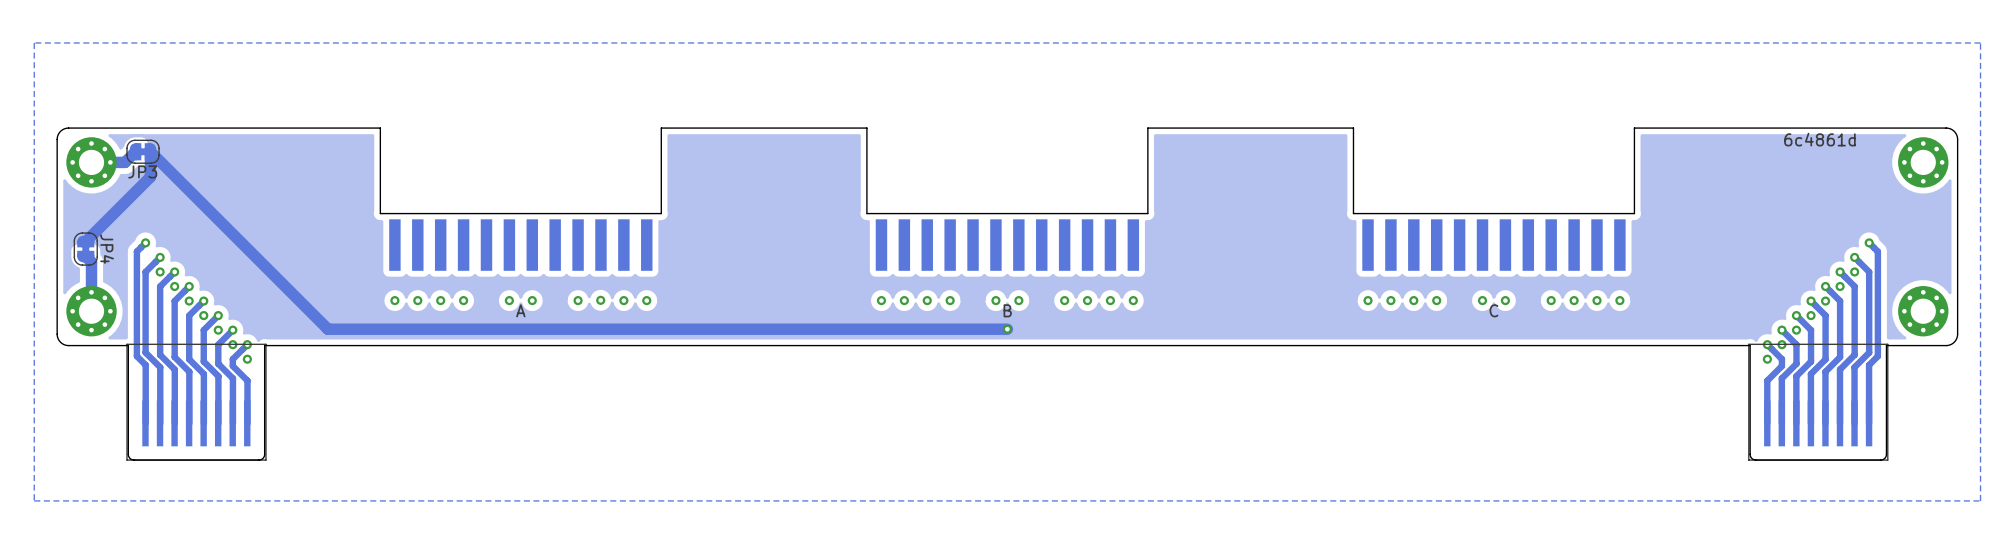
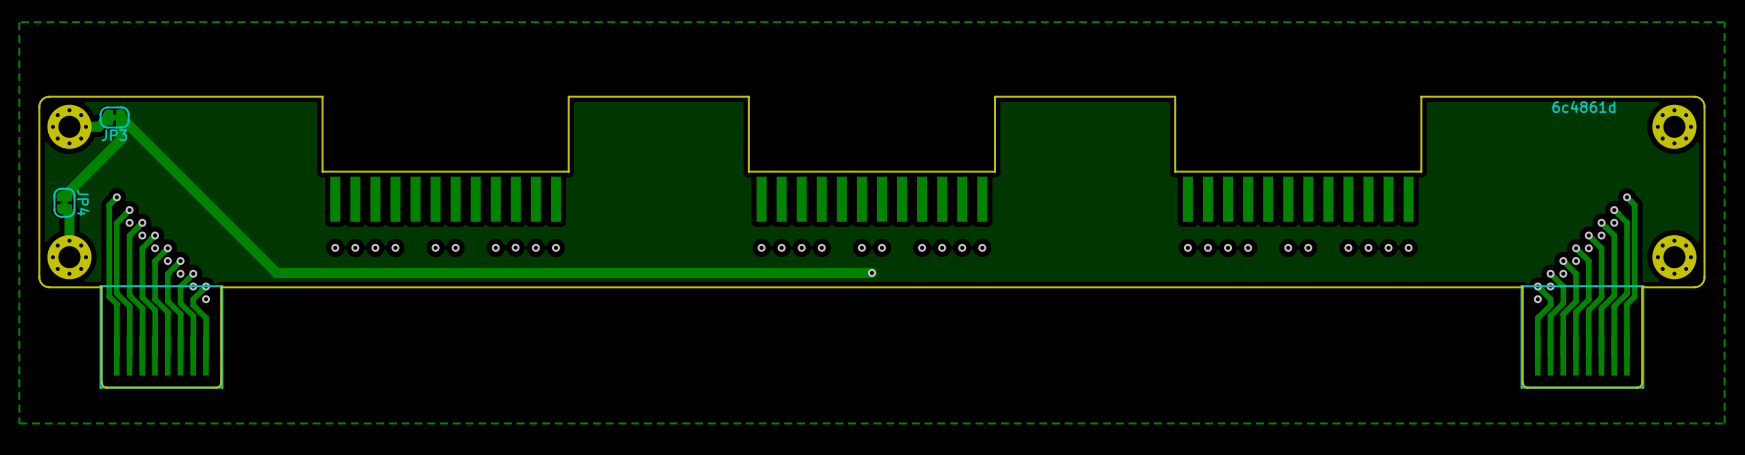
text: A (520, 310) -> none
text: B (1007, 310) -> none
text: C (1493, 310) -> none

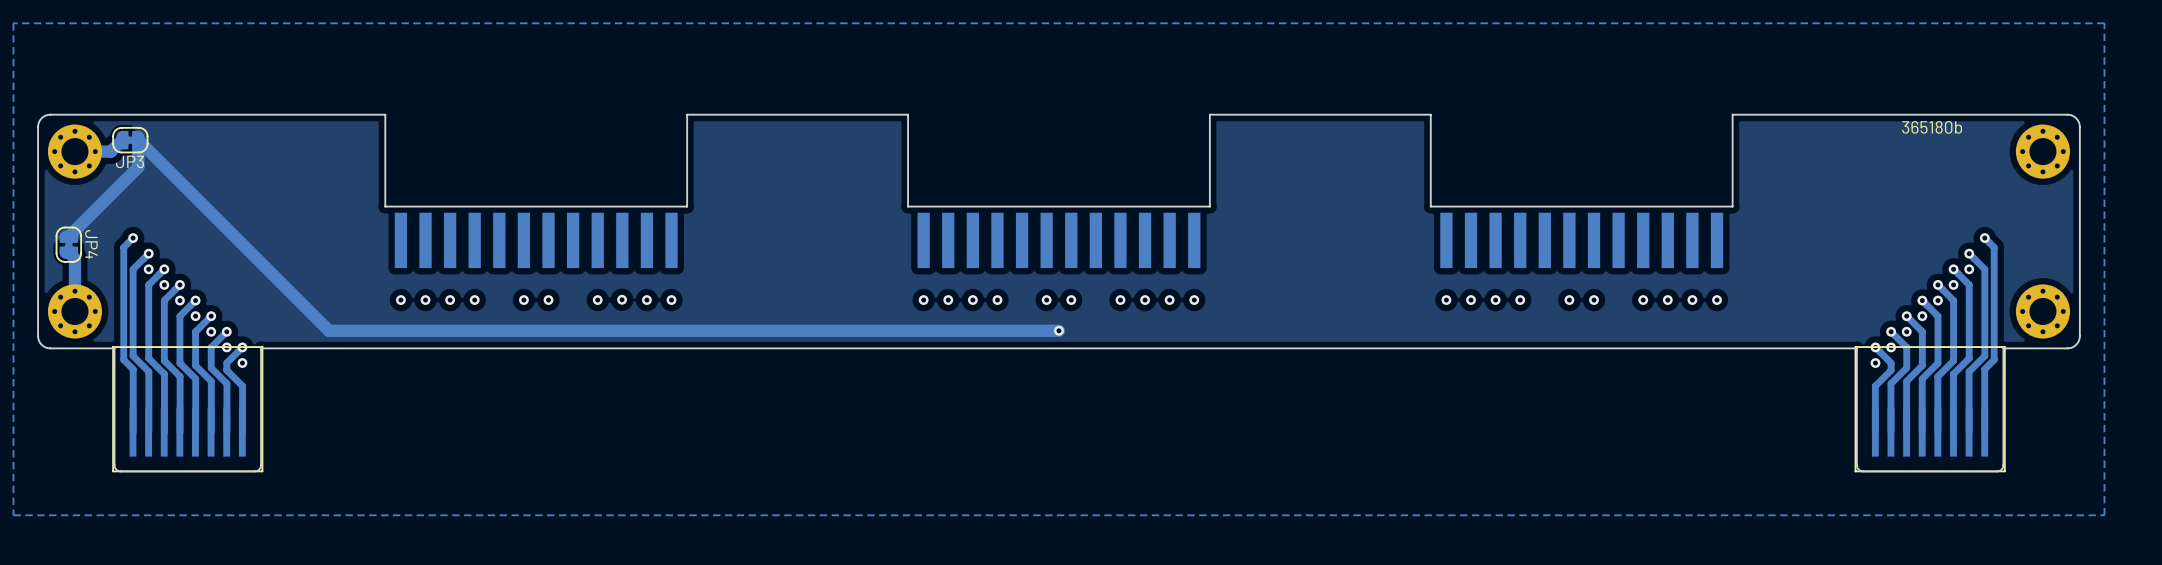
text: 6c4861d (1583, 106) -> 365180b (1932, 127)

